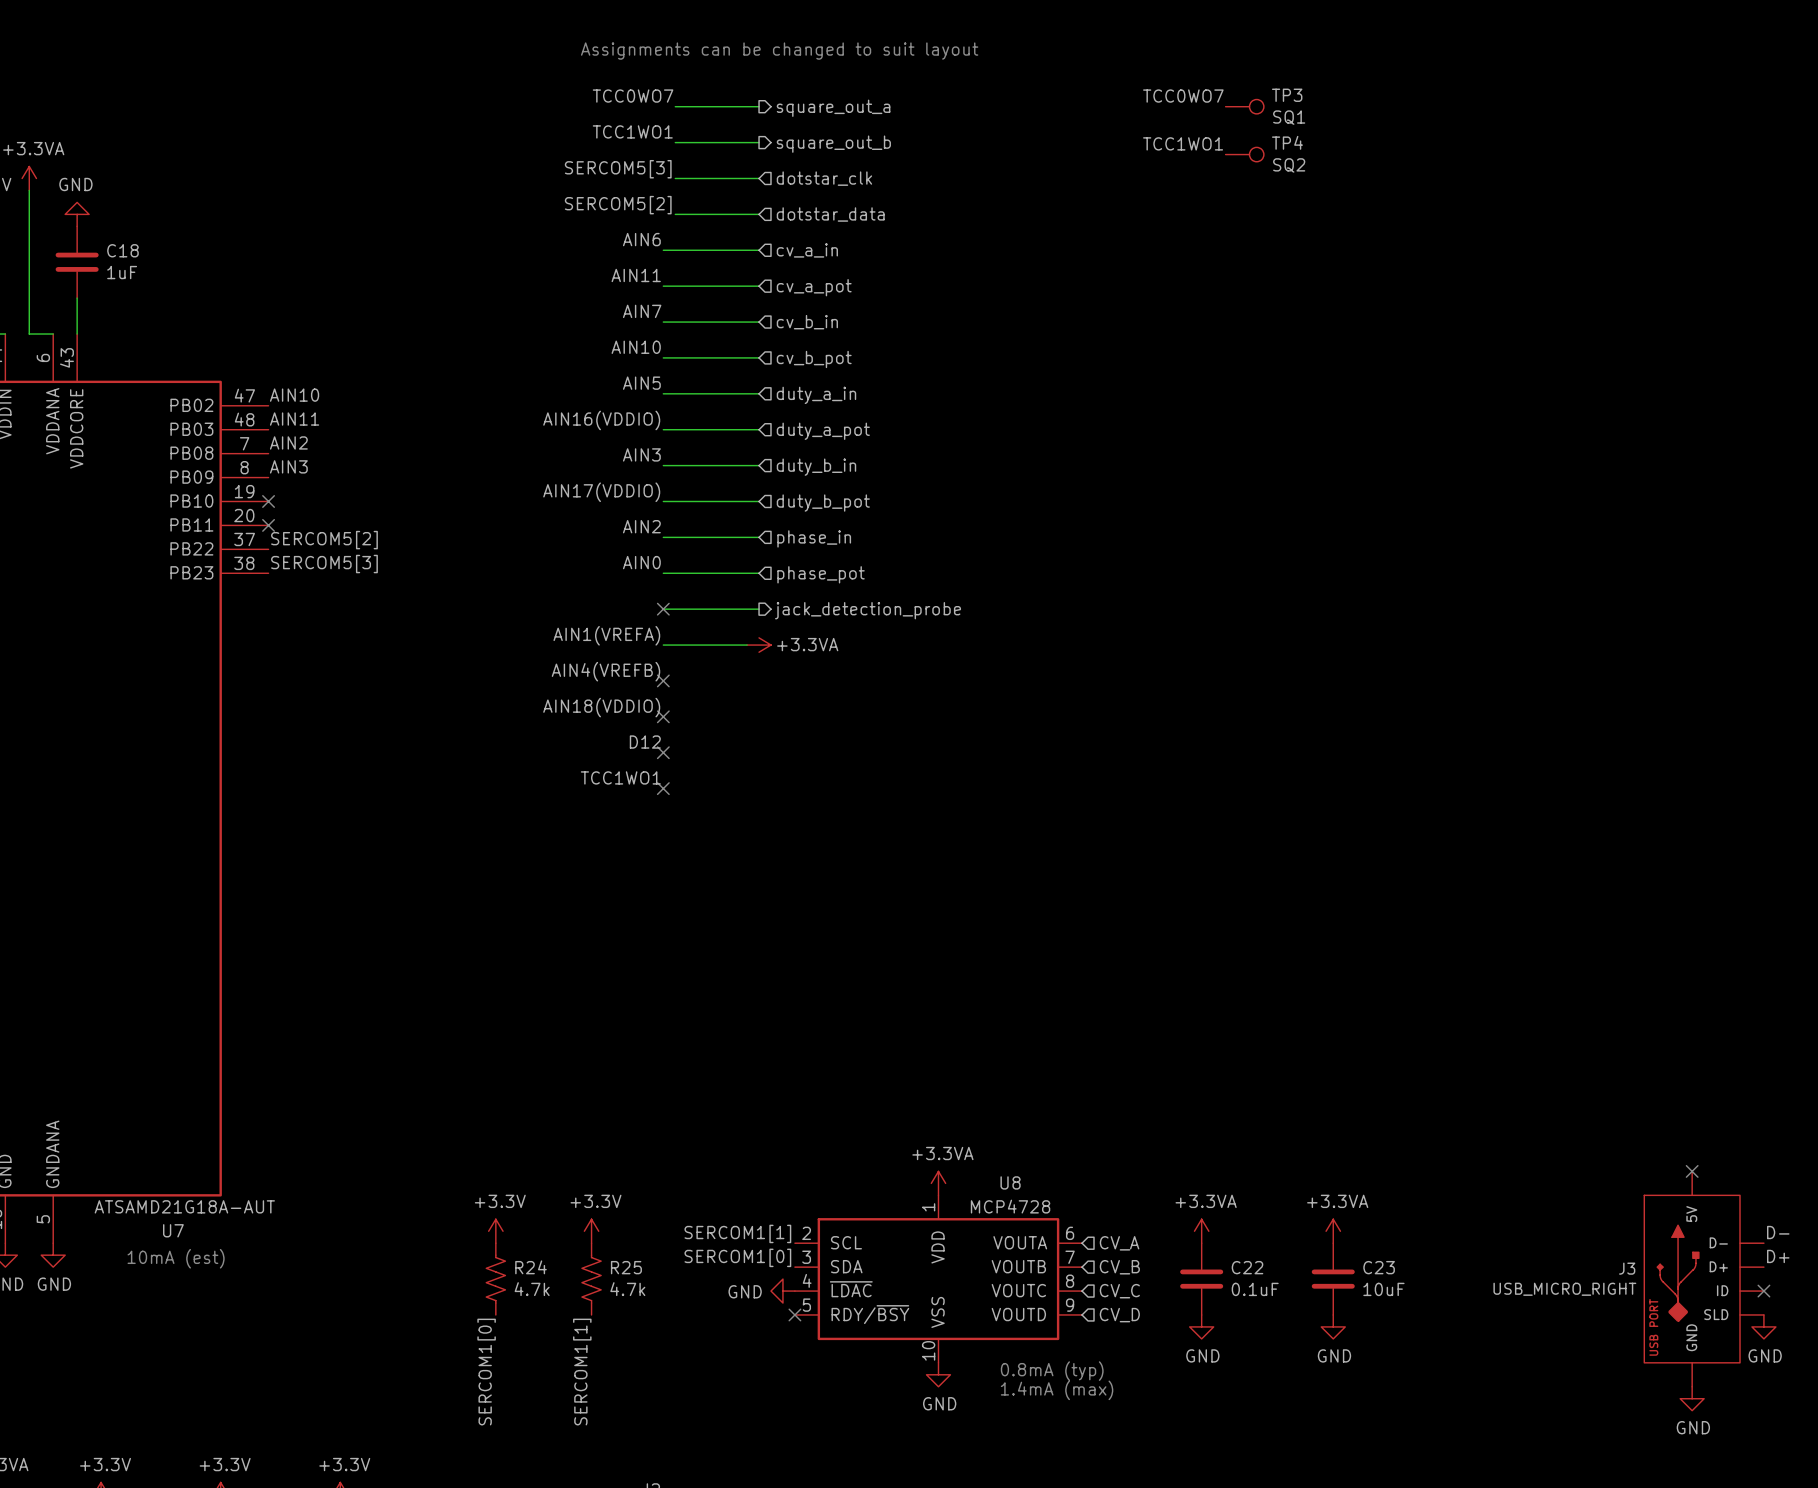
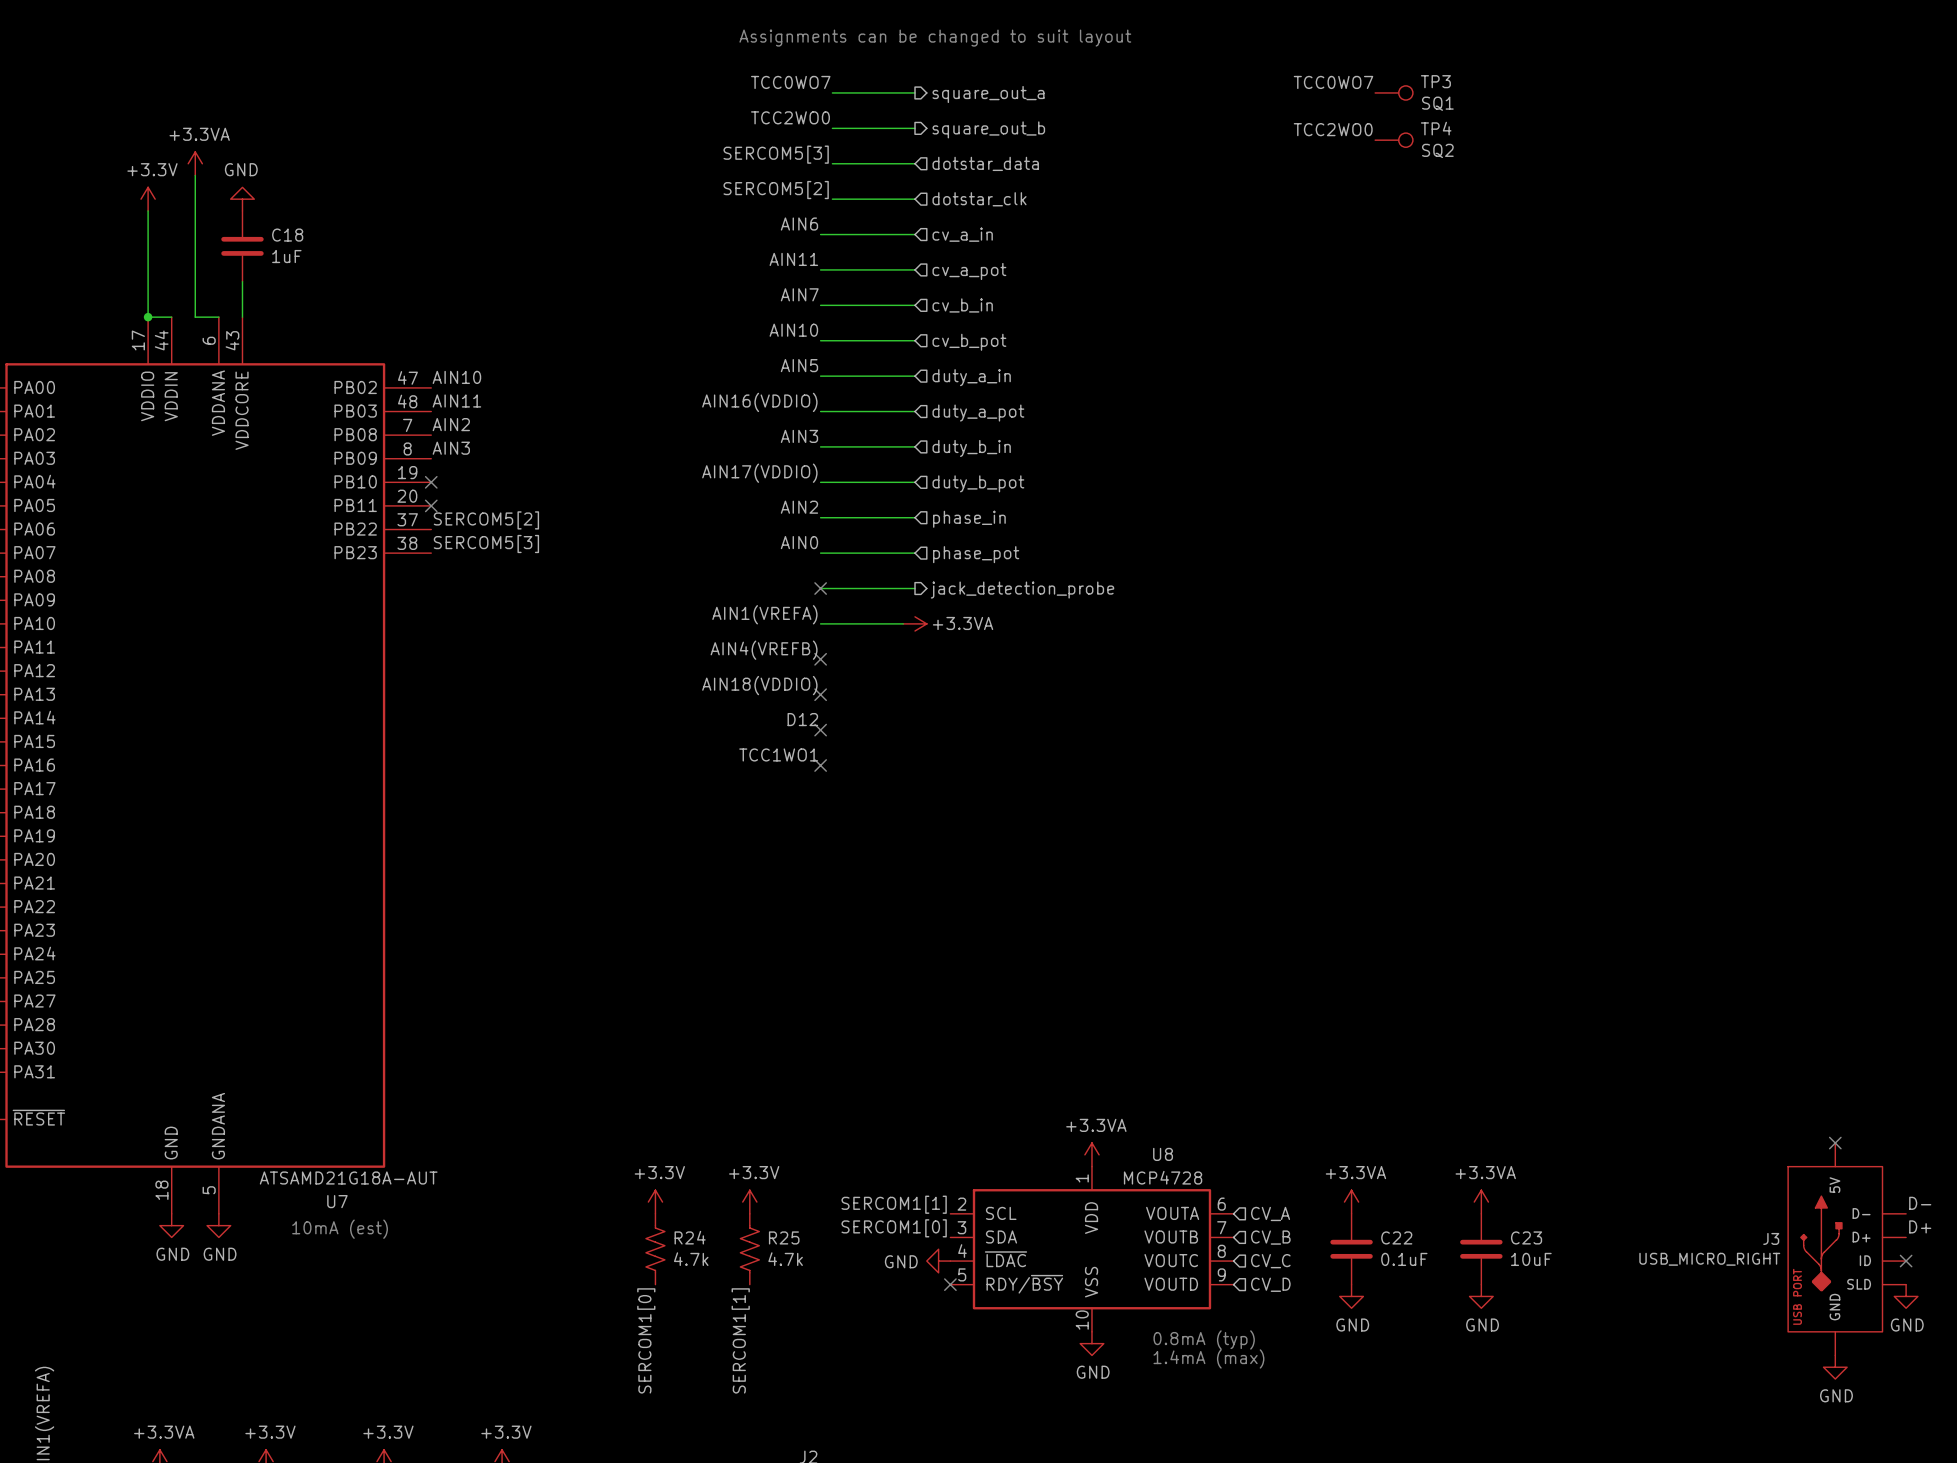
label: TCC1WO1 (632, 131) -> TCC2WO0 (790, 117)
label: TCC1WO1 (1183, 143) -> TCC2WO0 (1333, 129)
hierarchical label: dotstar_clk (824, 178) -> dotstar_data (985, 163)
hierarchical label: dotstar_data (830, 214) -> dotstar_clk (979, 199)

